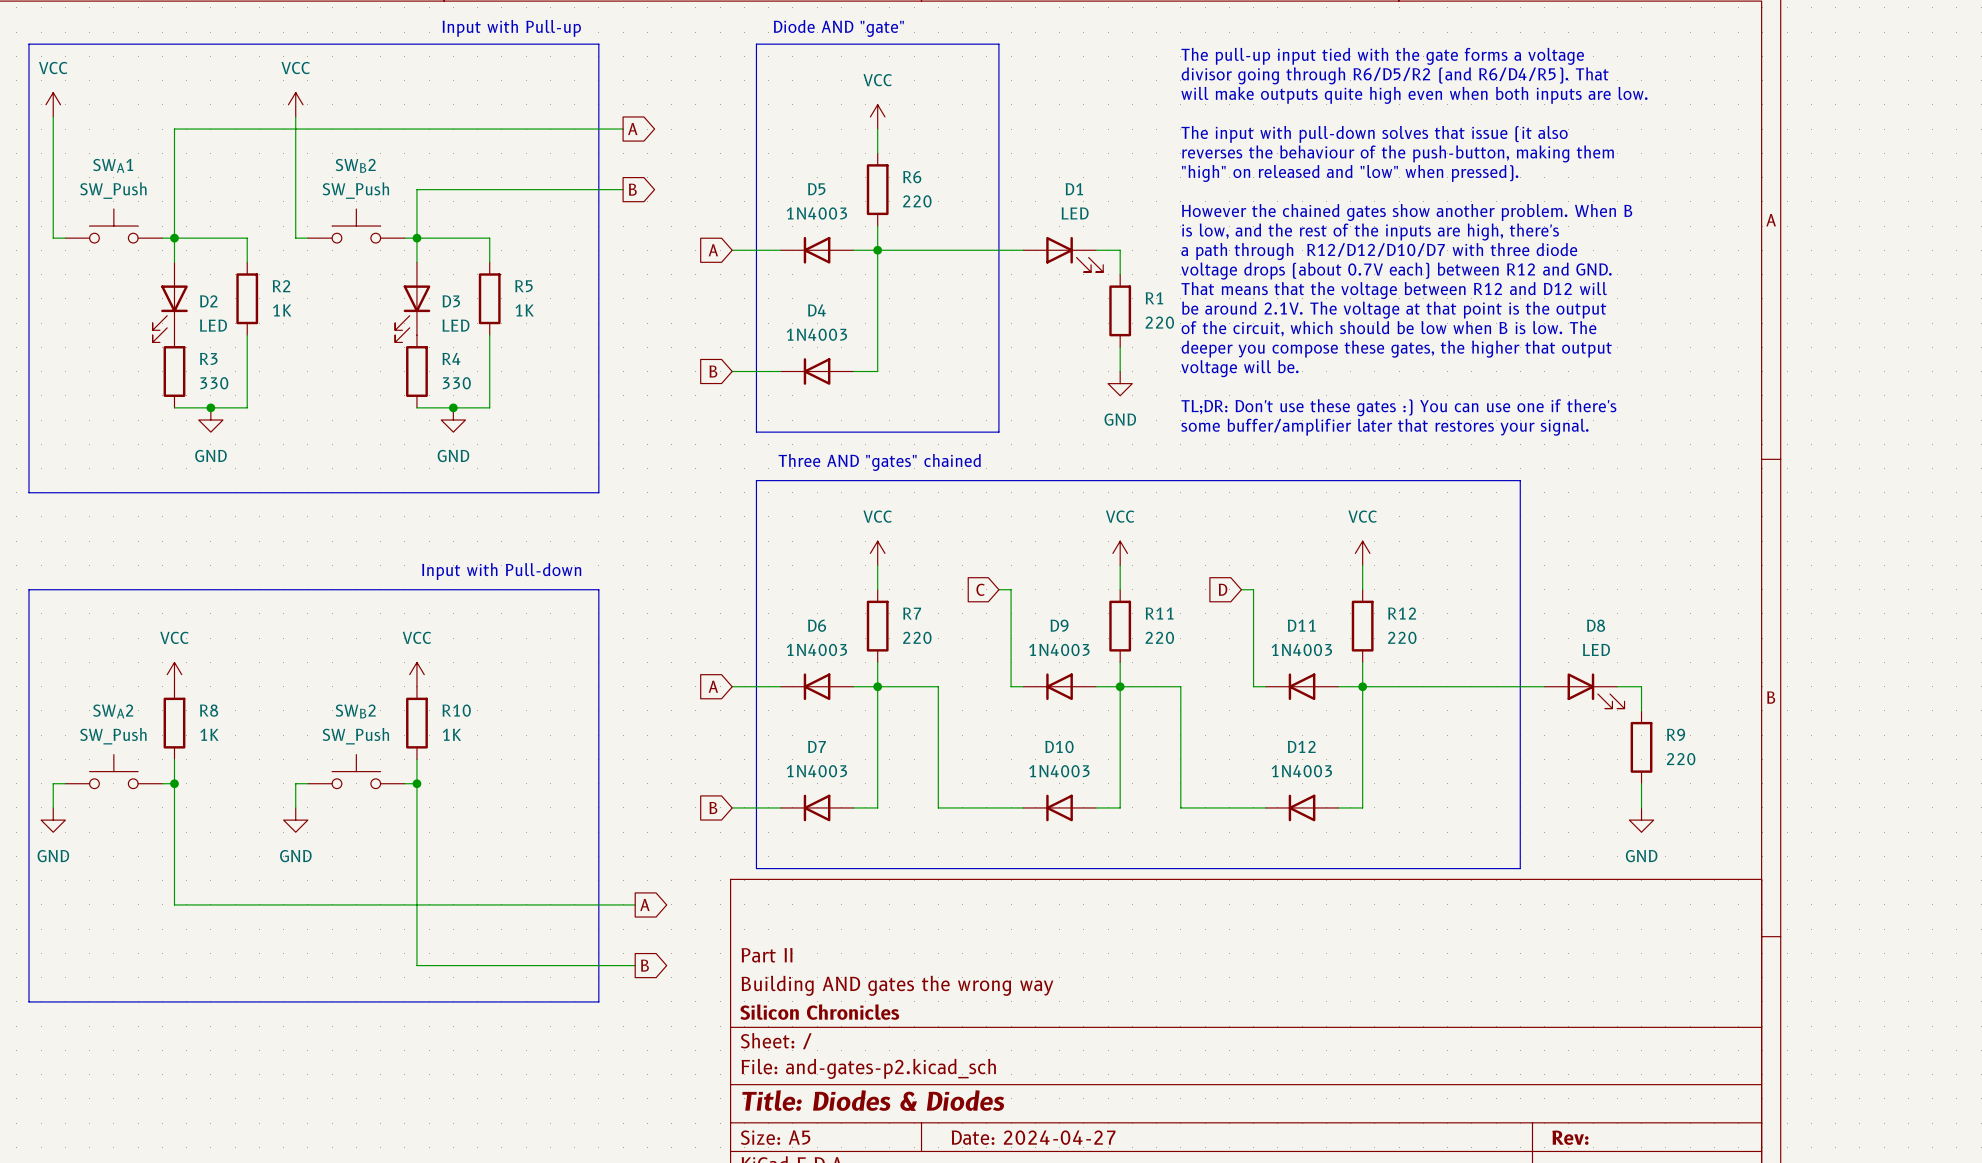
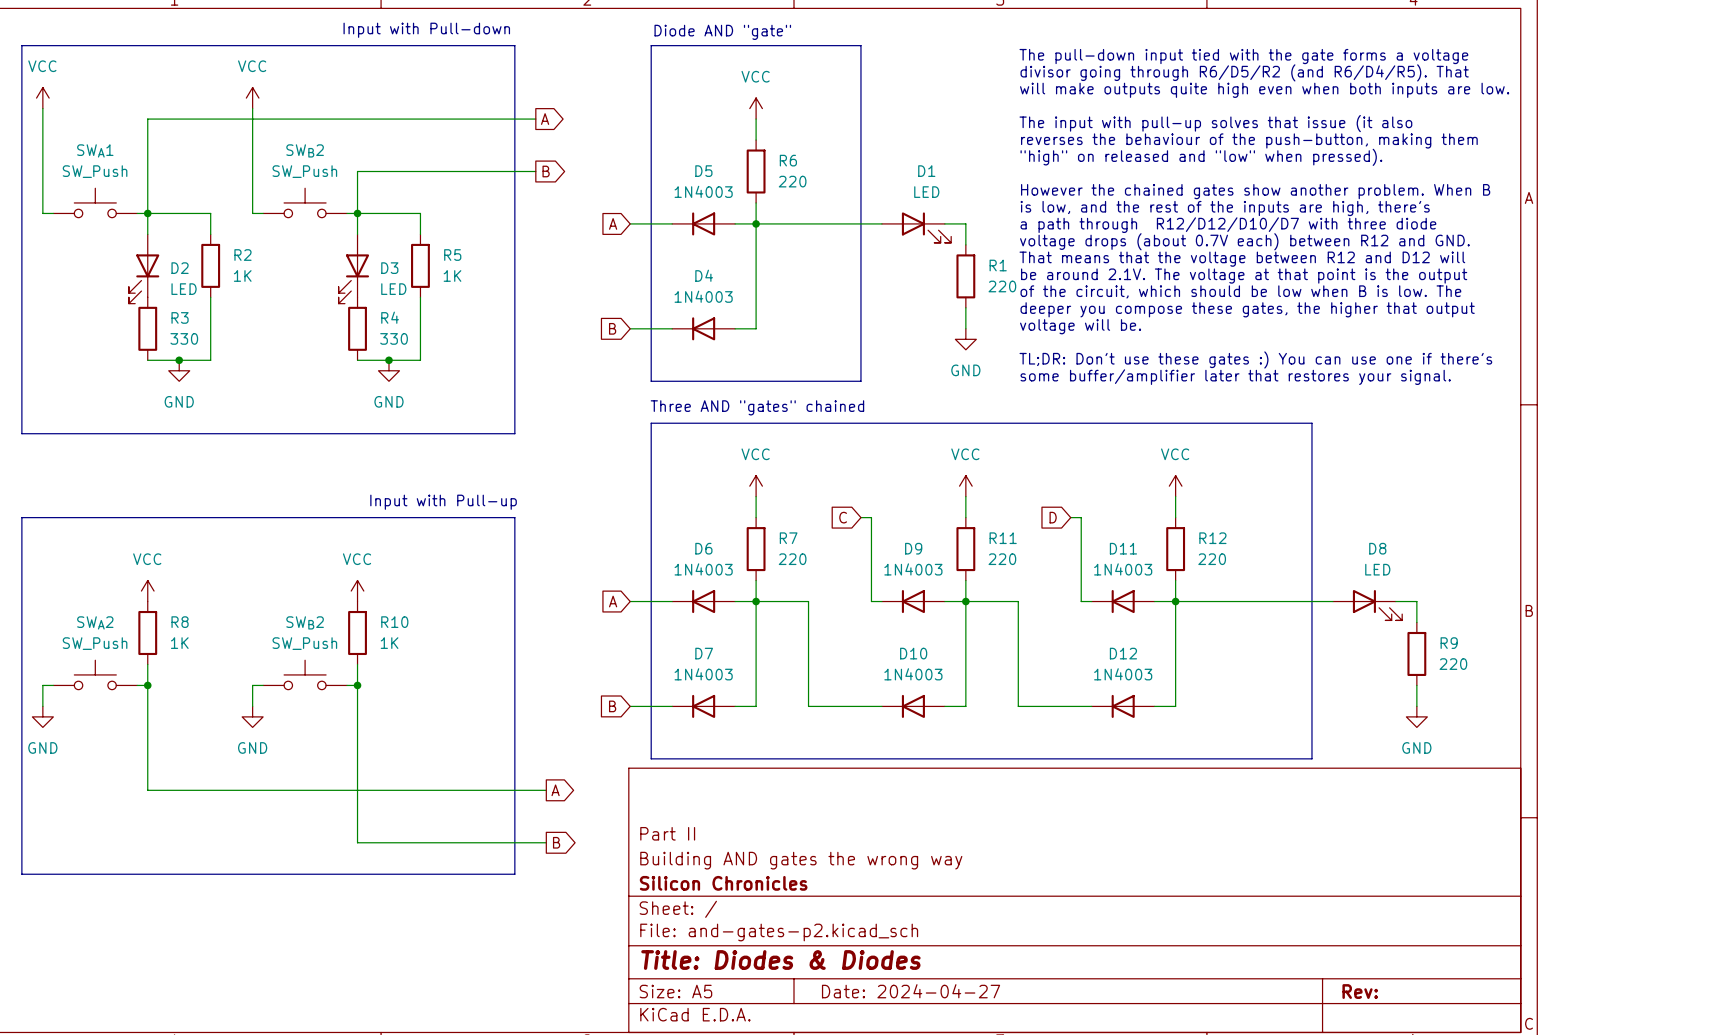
text: Input with Pull-up (511, 28) -> Input with Pull-down (426, 30)
text: The pull-up input tied with the gate forms a voltage (1382, 56) -> The pull-down input tied with the gate forms a voltage (1243, 56)
text: The input with pull-down solves that issue (it also (1374, 134) -> The input with pull-up solves that issue (it also (1215, 123)
text: Input with Pull-down (501, 571) -> Input with Pull-up (443, 502)

